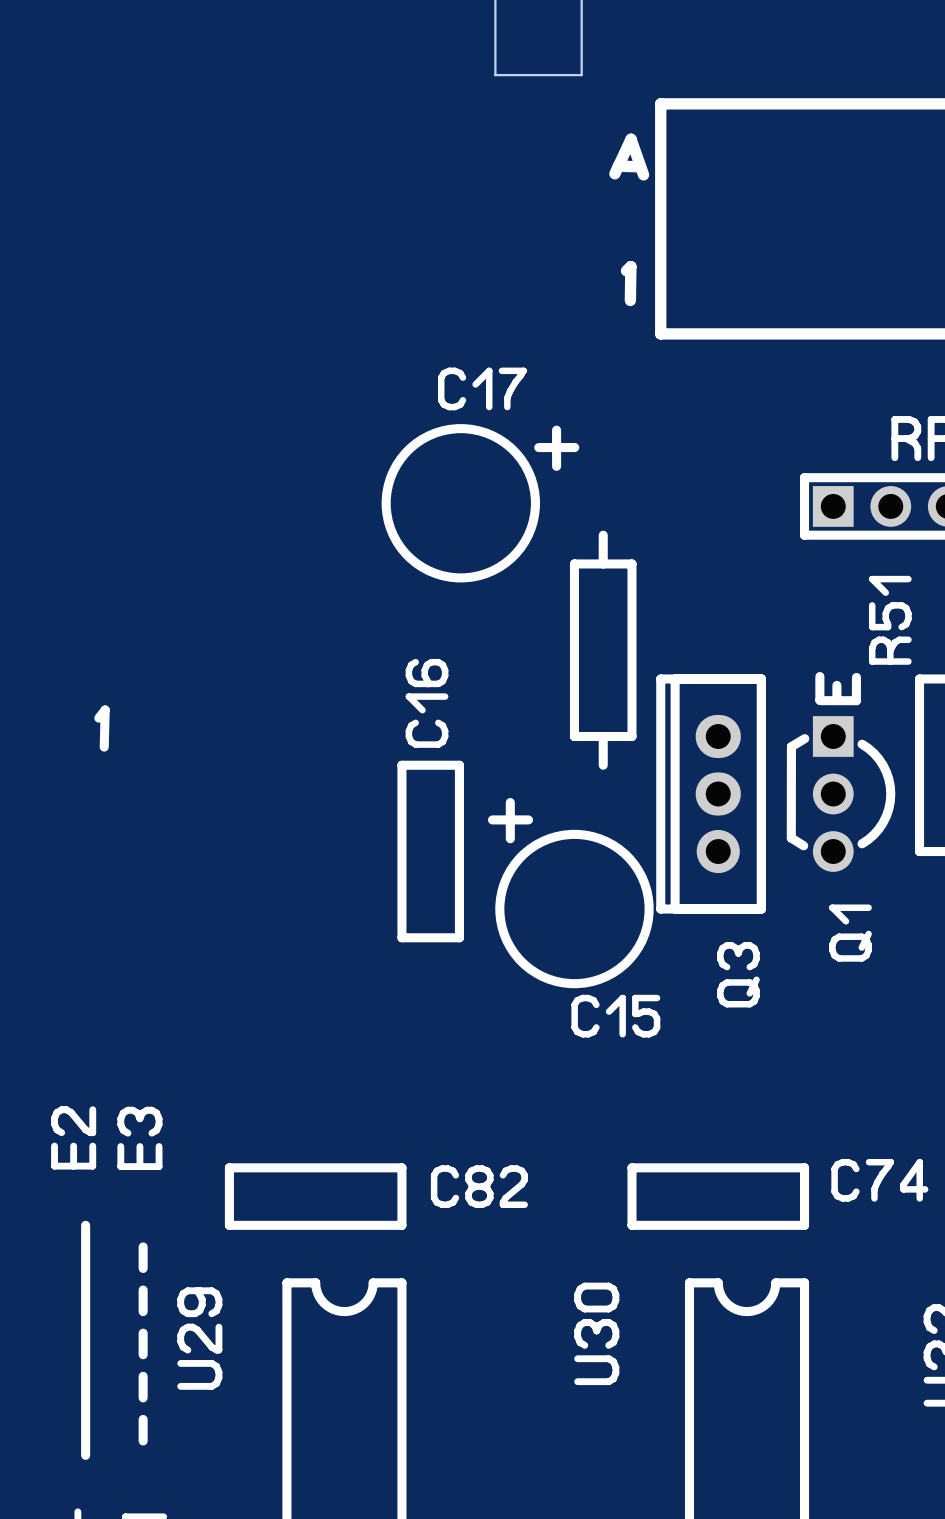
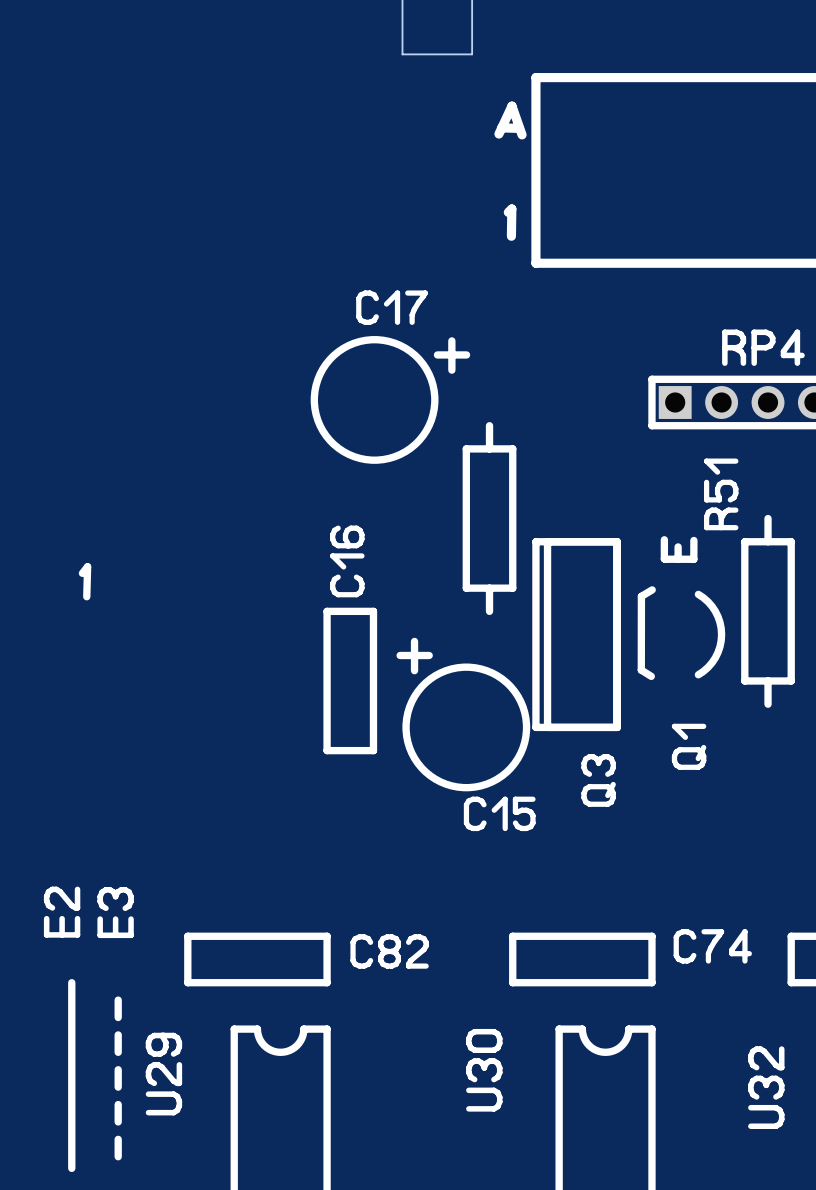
part: (718, 794) -> none
part: (833, 794) -> none

